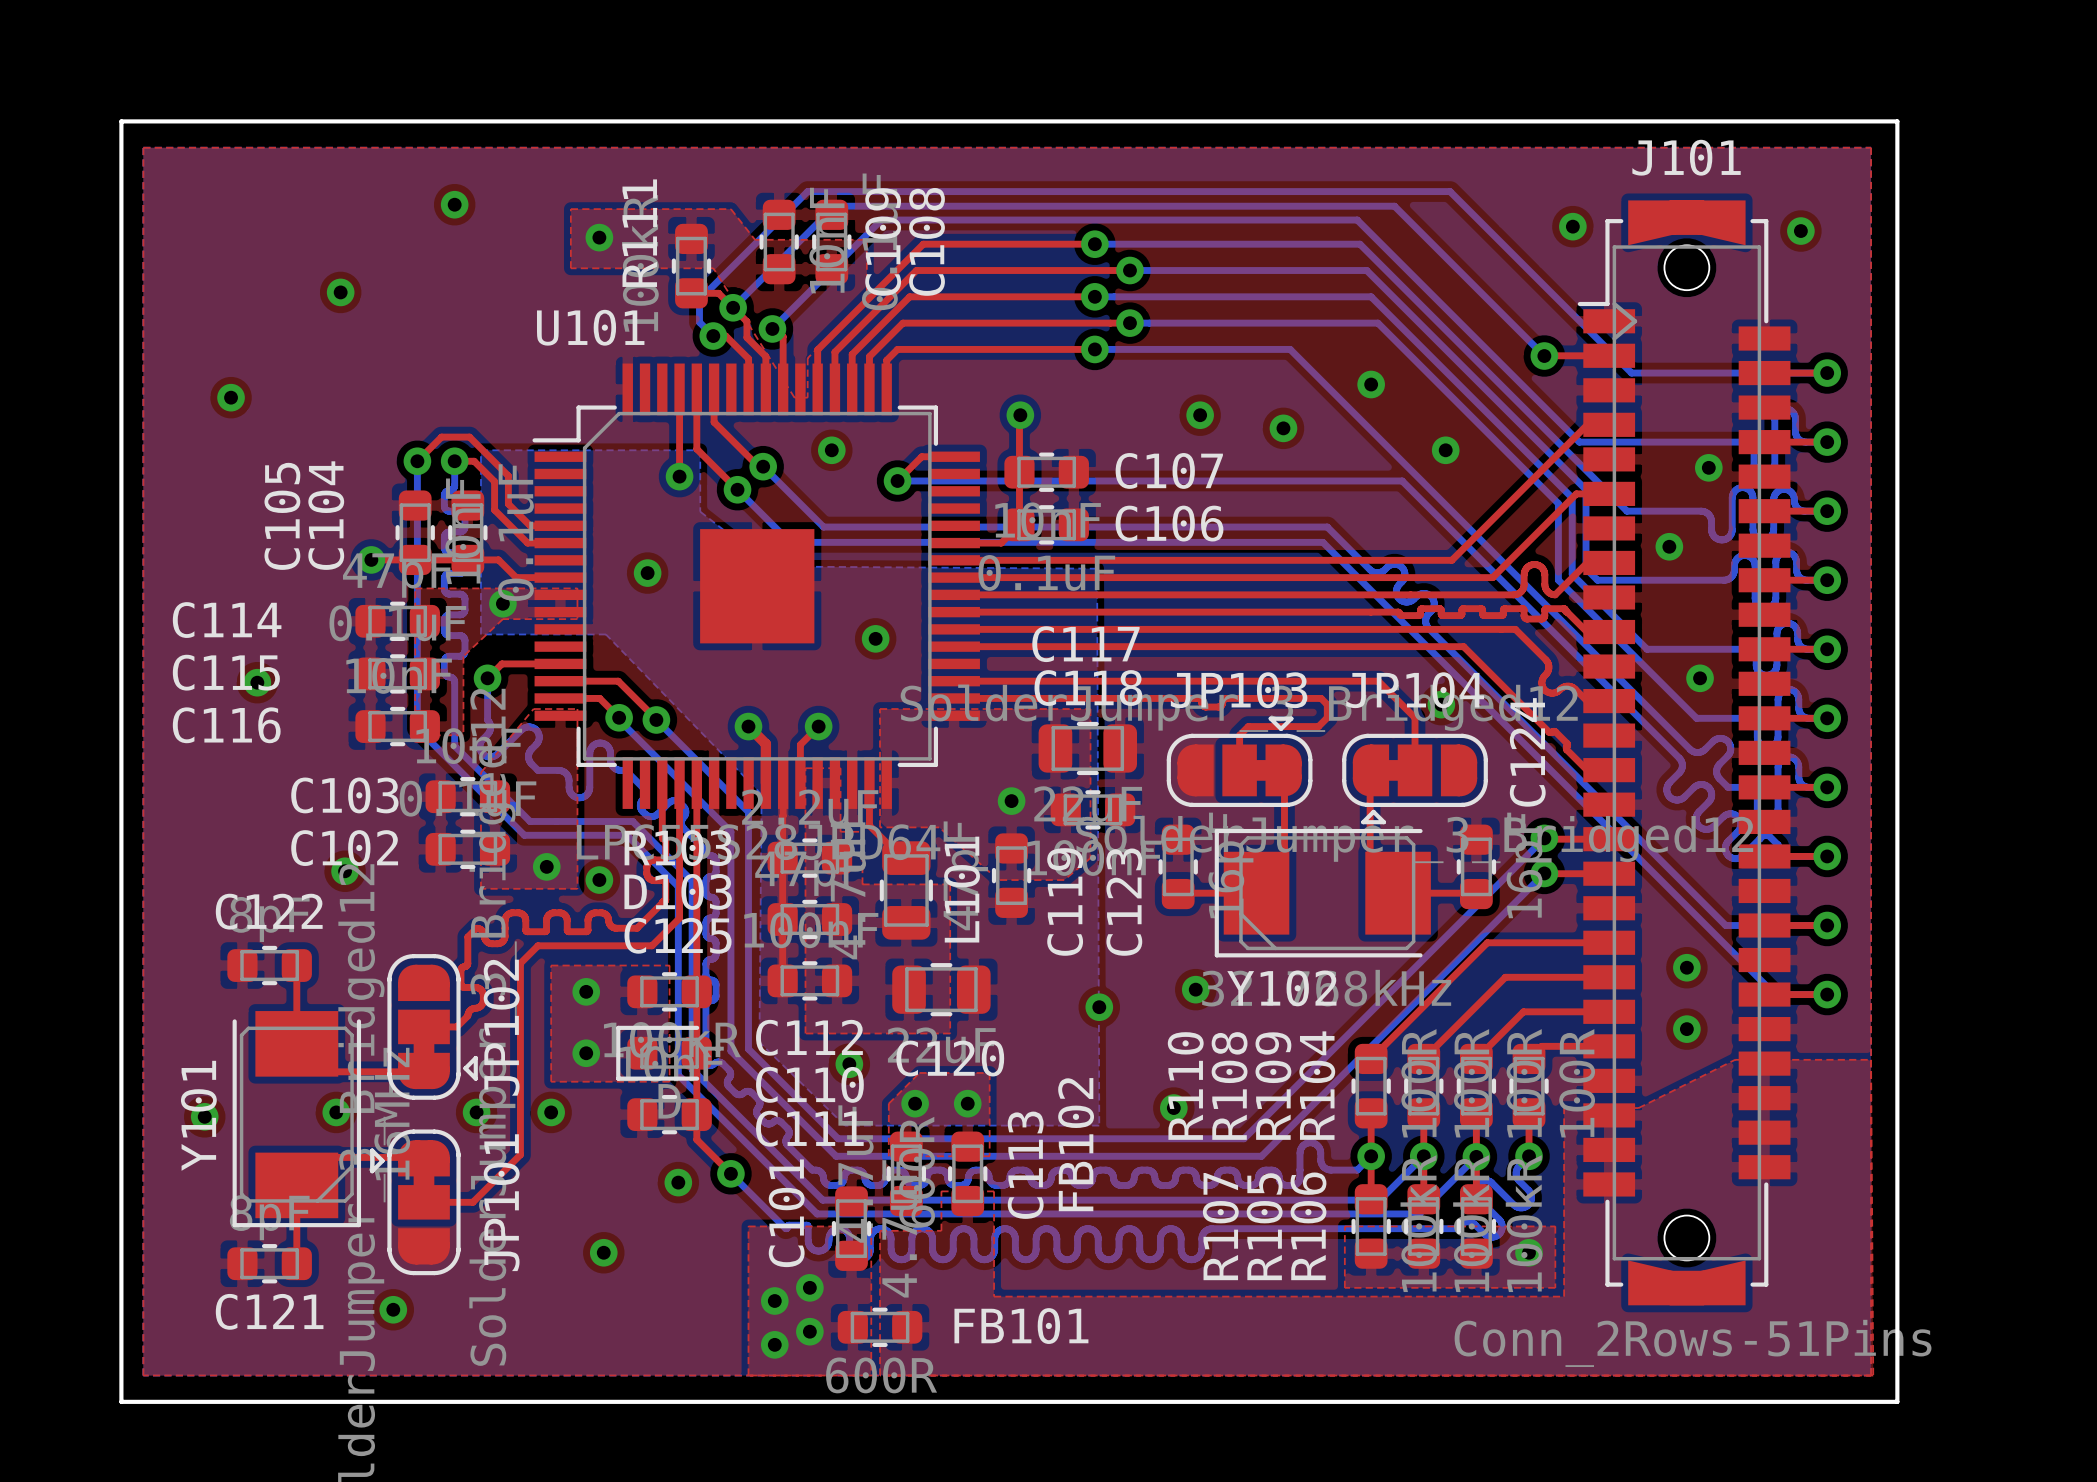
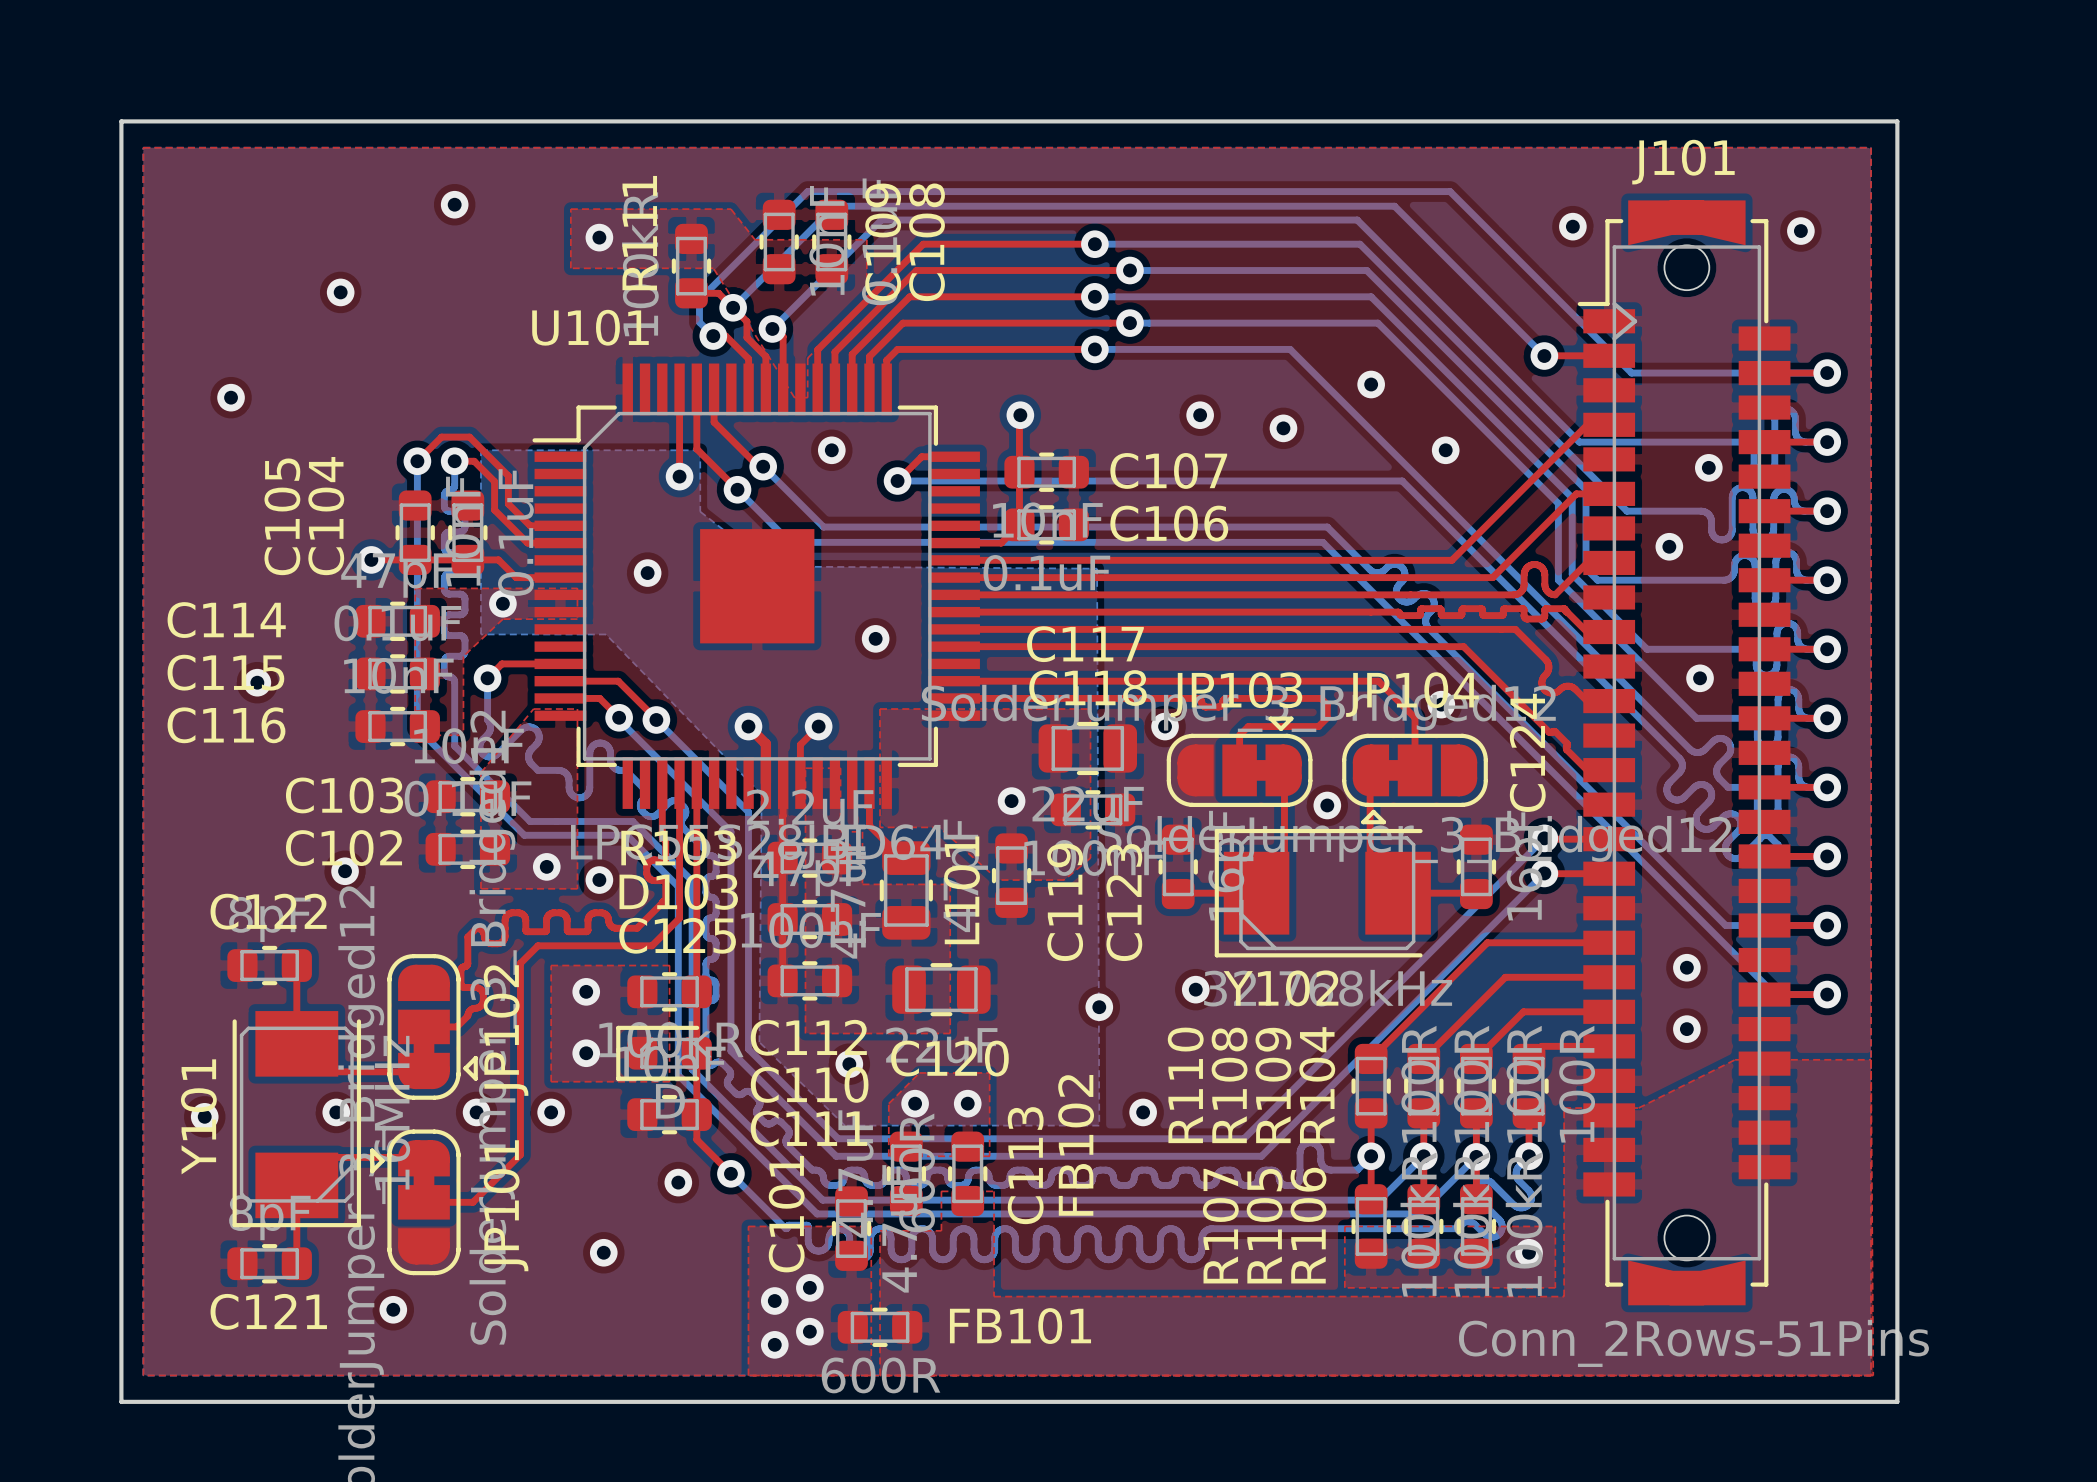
via: none -> (1165, 726)
via: none -> (1327, 805)
via position: (1173, 1108) -> (1143, 1112)

